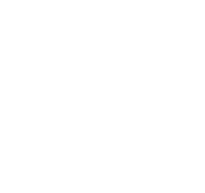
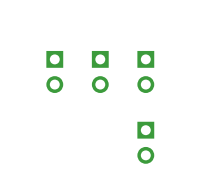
part: none -> (54, 71)
part: none -> (100, 71)
part: none -> (145, 71)
part: none -> (145, 142)

